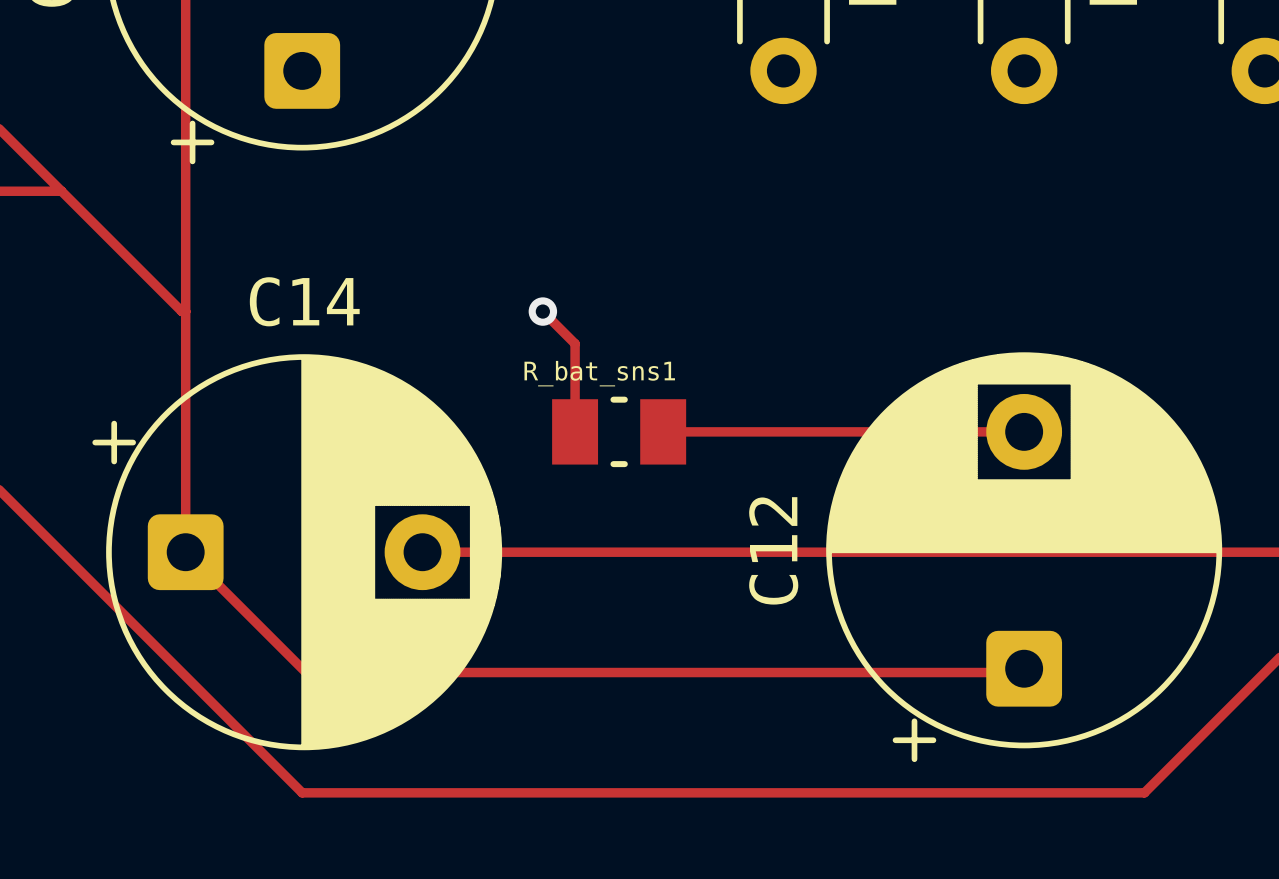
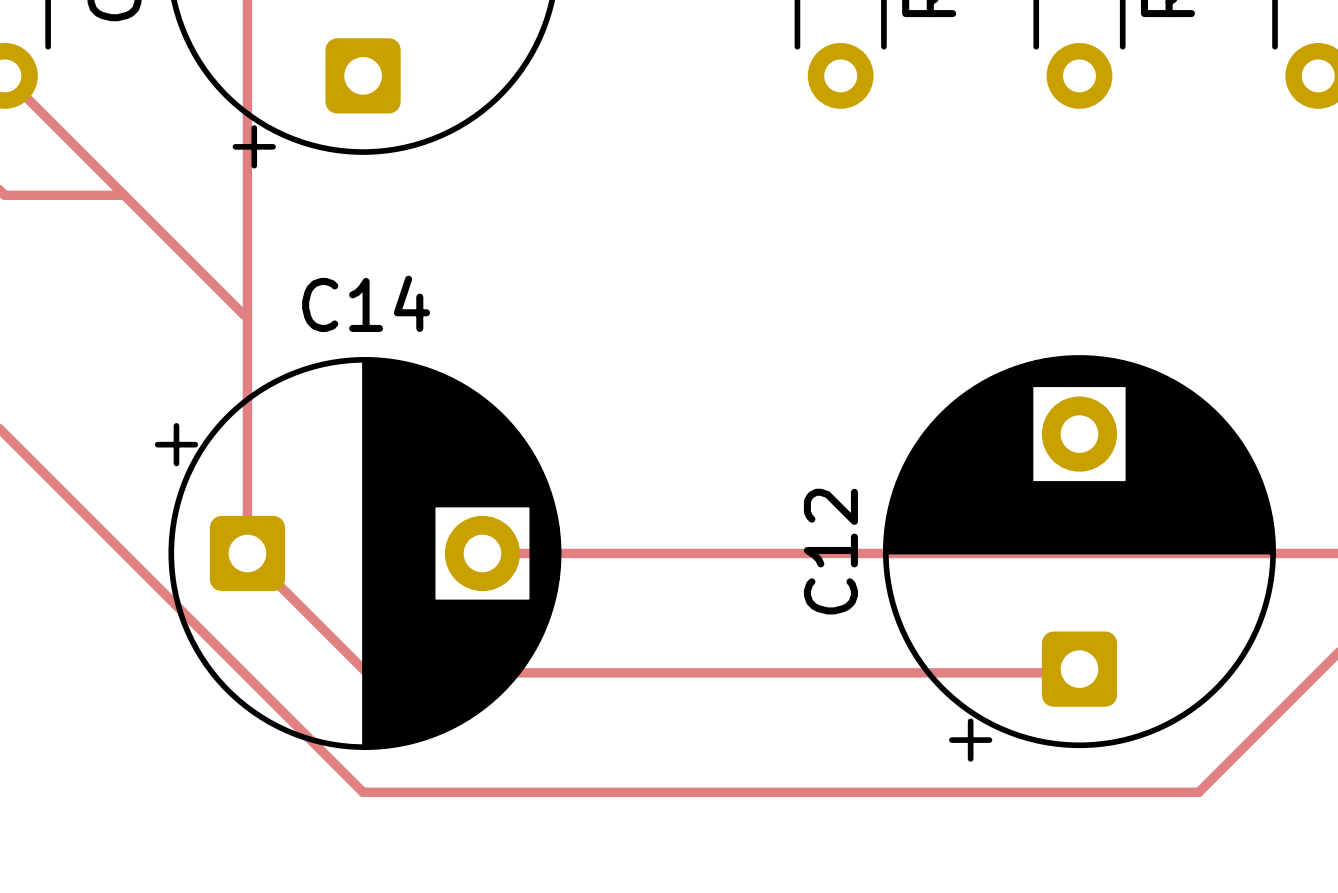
track: (542, 311) (575, 343) (575, 431) -> none
via: (542, 311) -> none
R_bat_sns1: (619, 431) -> none
track: (663, 431) (1024, 431) -> none

